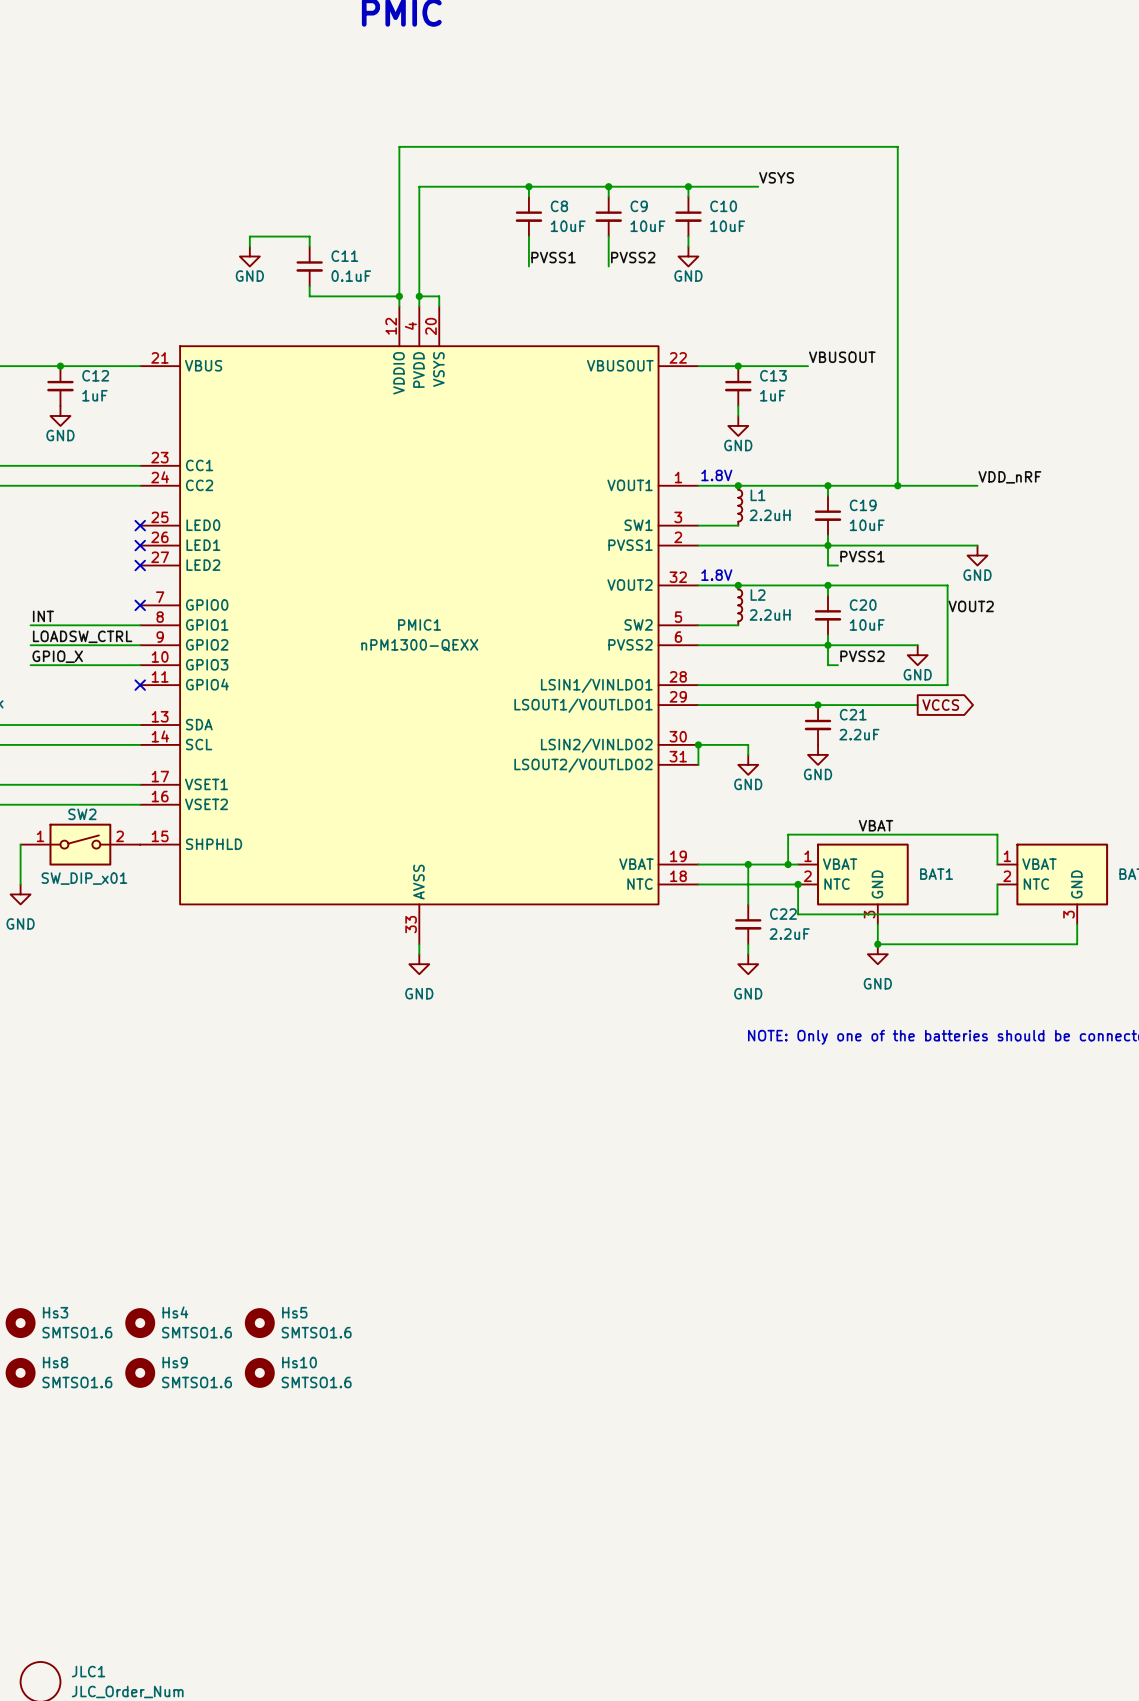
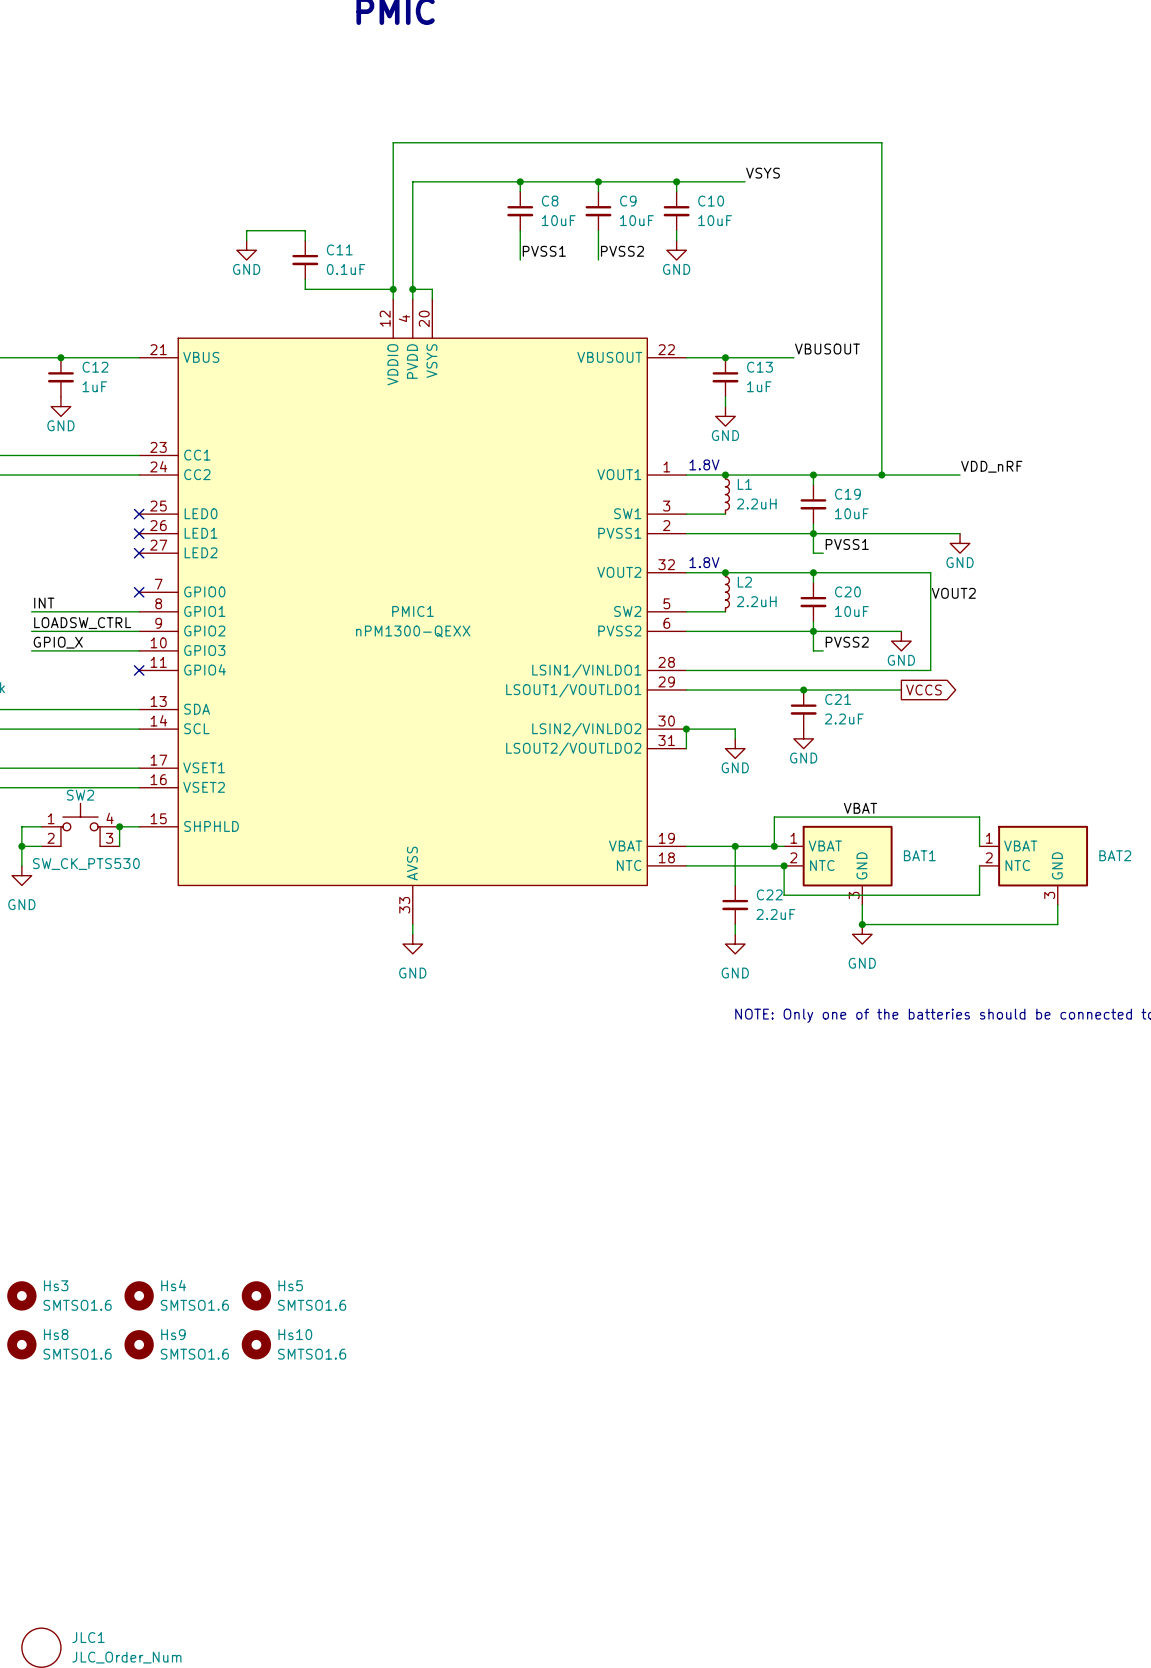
SW2 symbol: [20, 823, 141, 866] -> [41, 803, 120, 847]
junction: none -> (119, 826)
wire: none -> (139, 826) (119, 826) (119, 846)
wire: none -> (21, 846) (41, 846)
junction: none -> (21, 846)
SW2 value: SW_DIP_x01 (84, 878) -> SW_CK_PTS530 (86, 864)

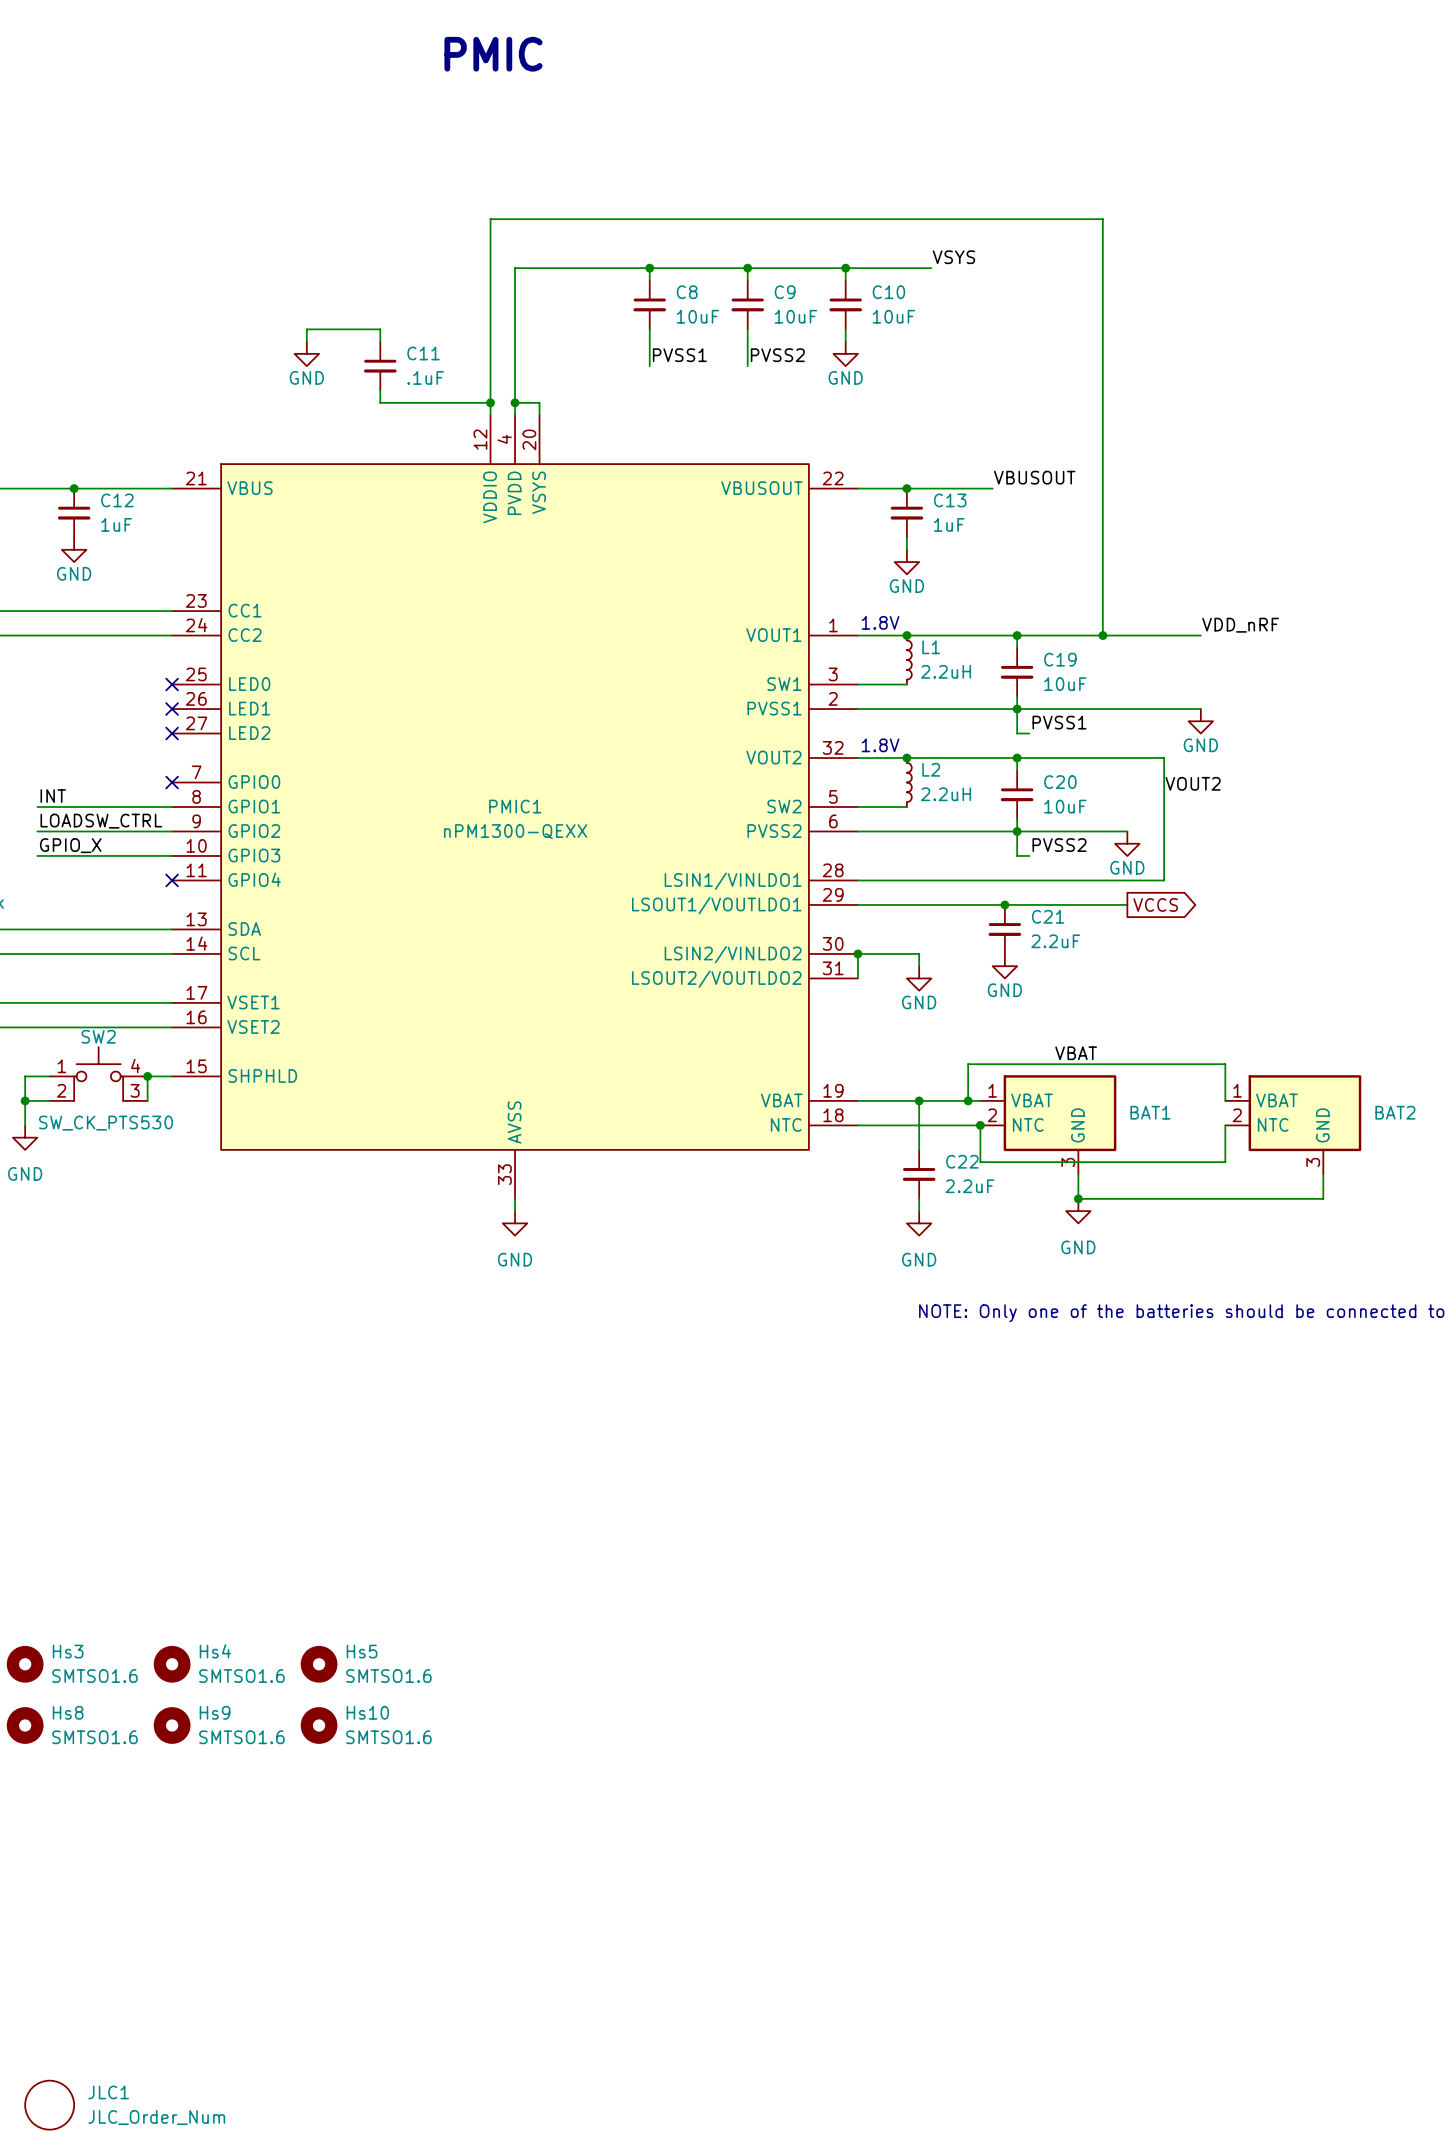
C11 value: 0.1uF (346, 269) -> .1uF (425, 377)

